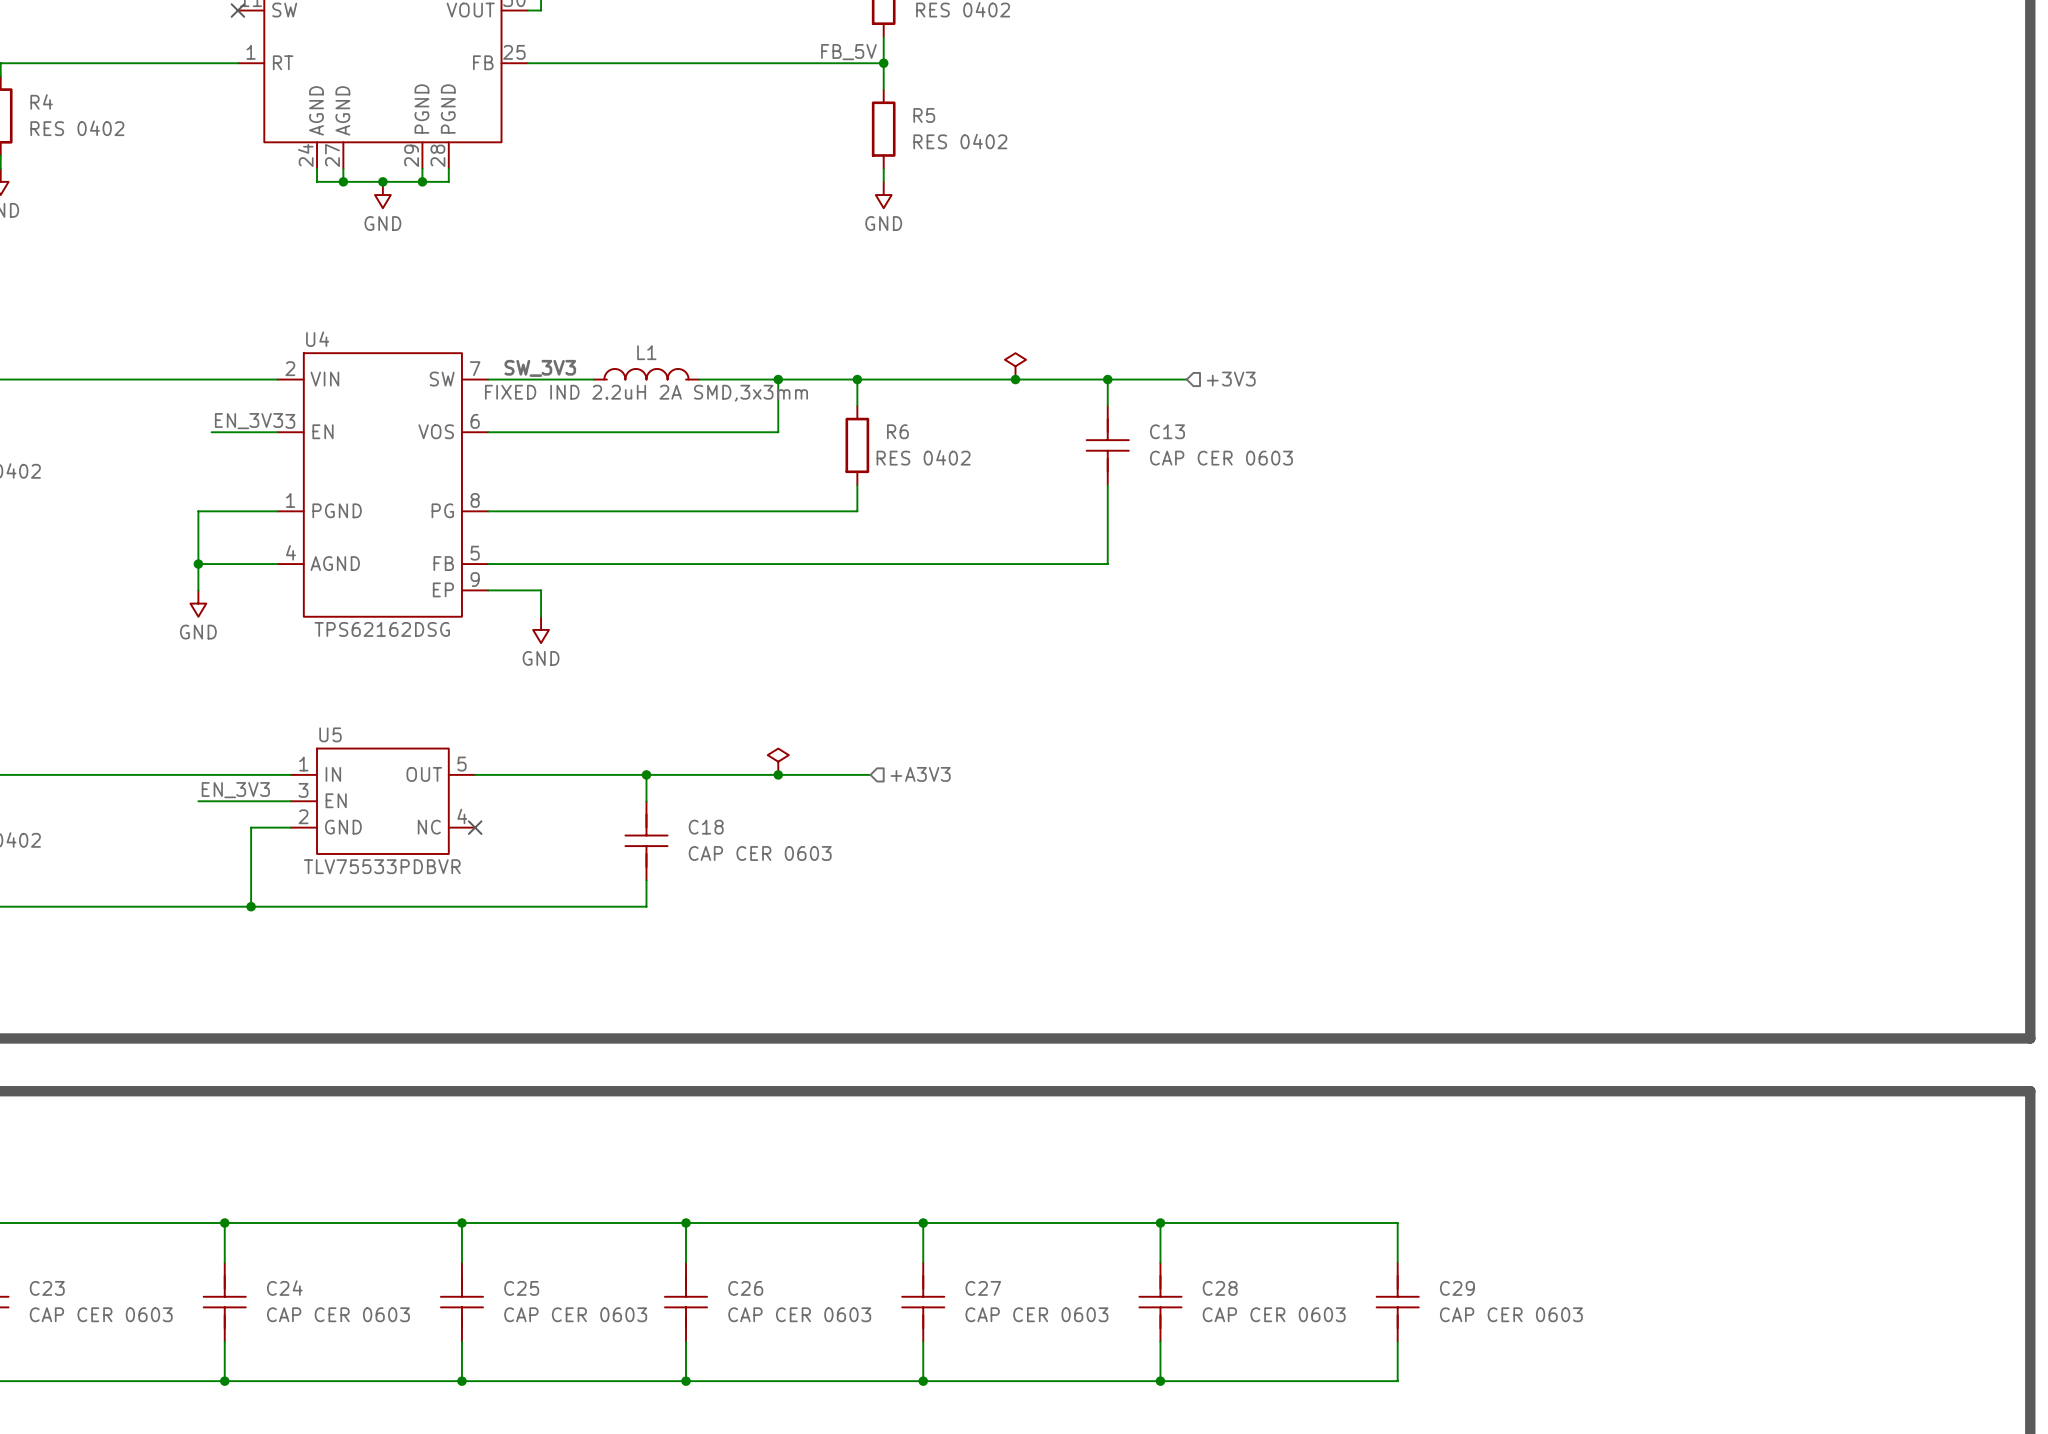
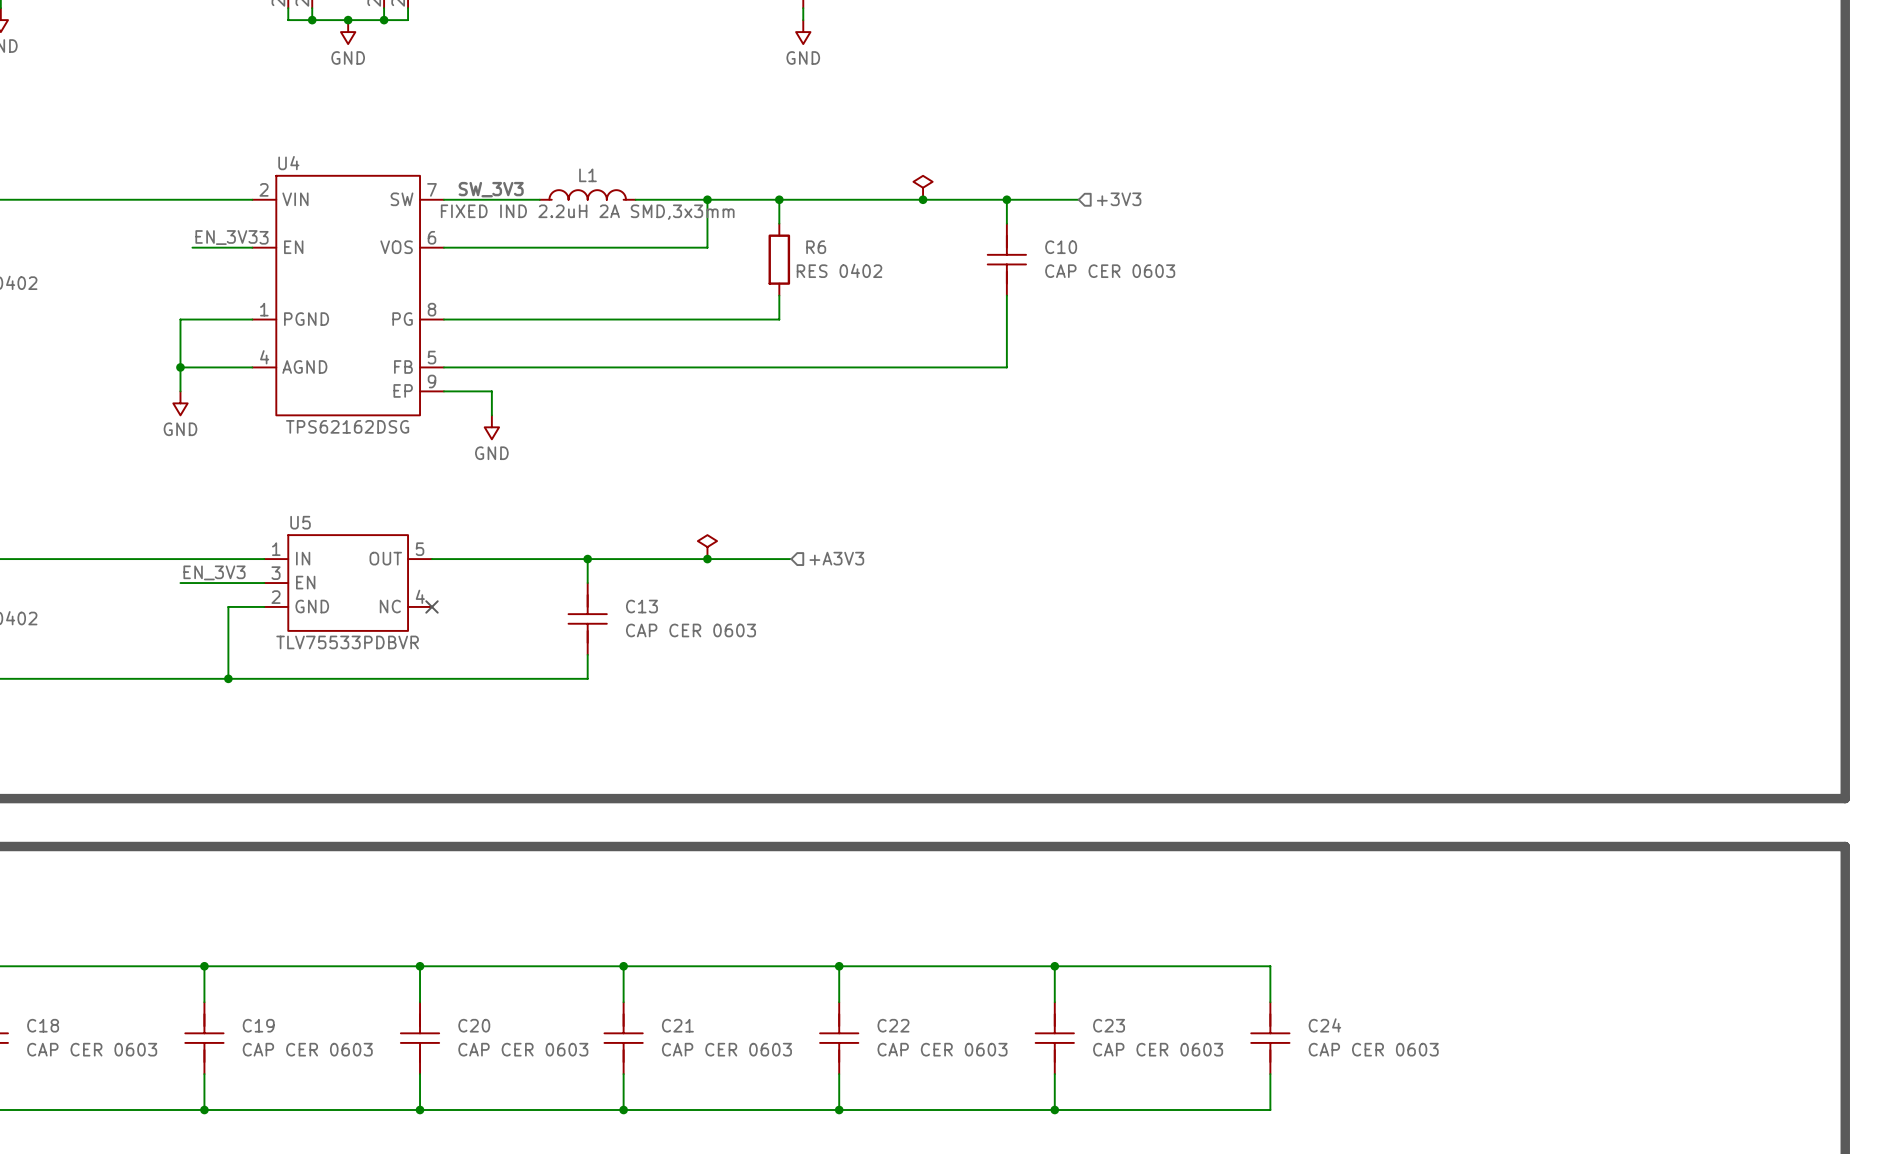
C13 name: C13 (1167, 431) -> C10 (1061, 247)
C18 name: C18 (706, 827) -> C13 (641, 606)
C23 name: C23 (47, 1288) -> C18 (43, 1025)
C24 name: C24 (284, 1288) -> C19 (258, 1025)
C25 name: C25 (521, 1288) -> C20 (474, 1025)
C26 name: C26 (745, 1288) -> C21 (677, 1025)
C27 name: C27 (983, 1288) -> C22 (893, 1025)
C28 name: C28 (1220, 1288) -> C23 (1109, 1025)
C29 name: C29 (1457, 1288) -> C24 (1324, 1025)

